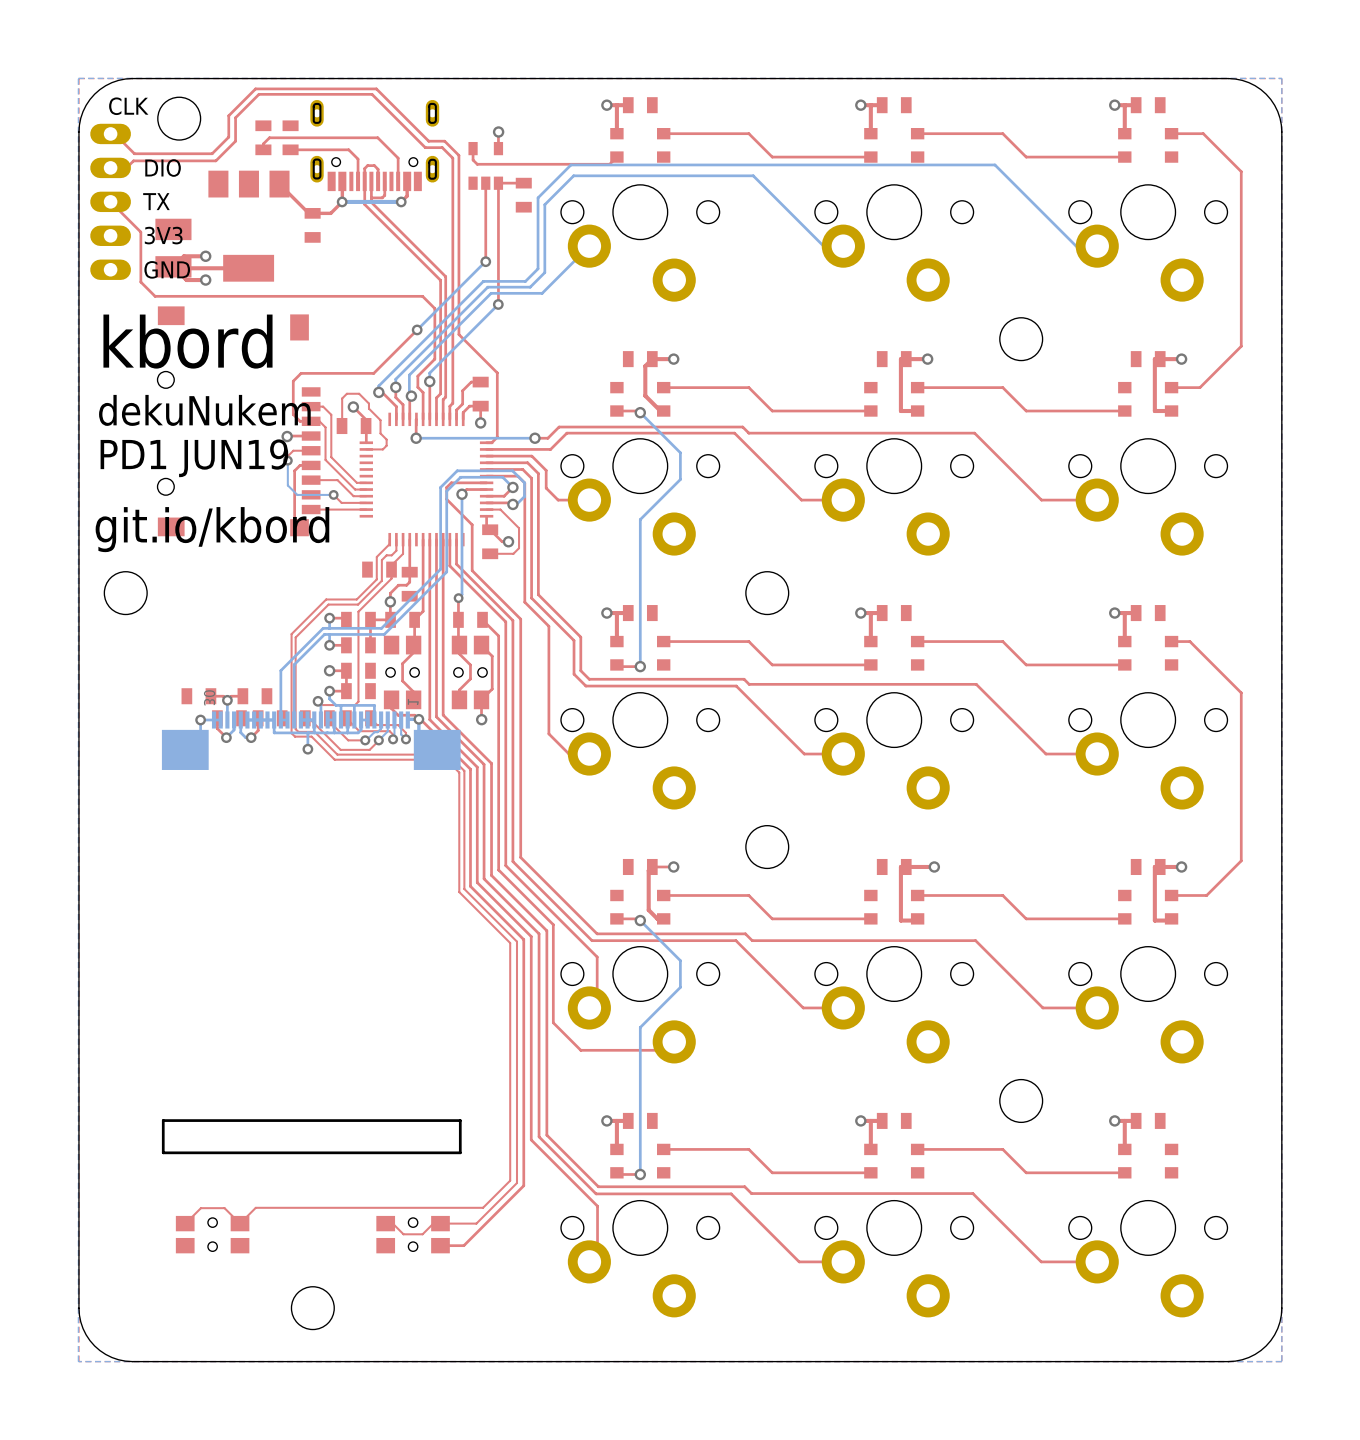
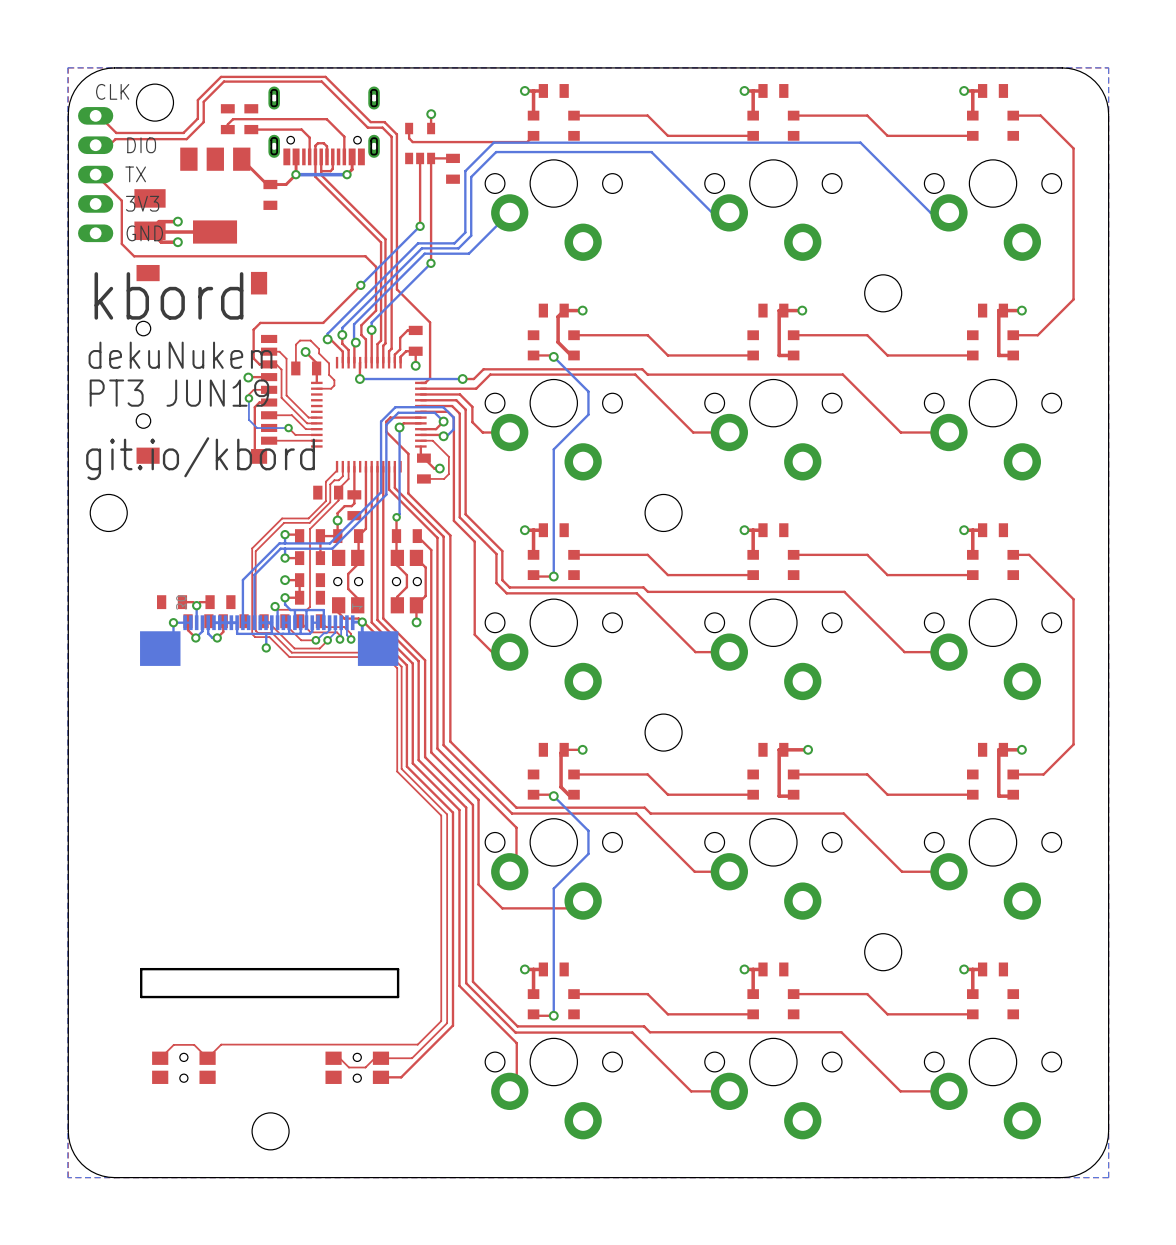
text: PD1 JUN19 (194, 458) -> PT3 JUN19 (179, 393)

